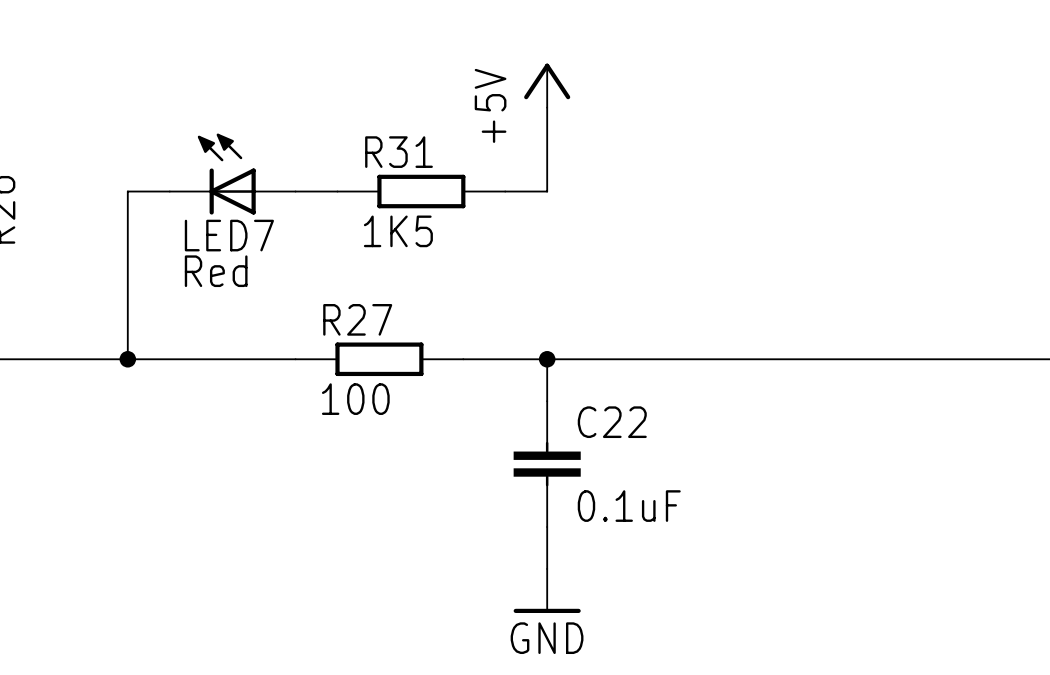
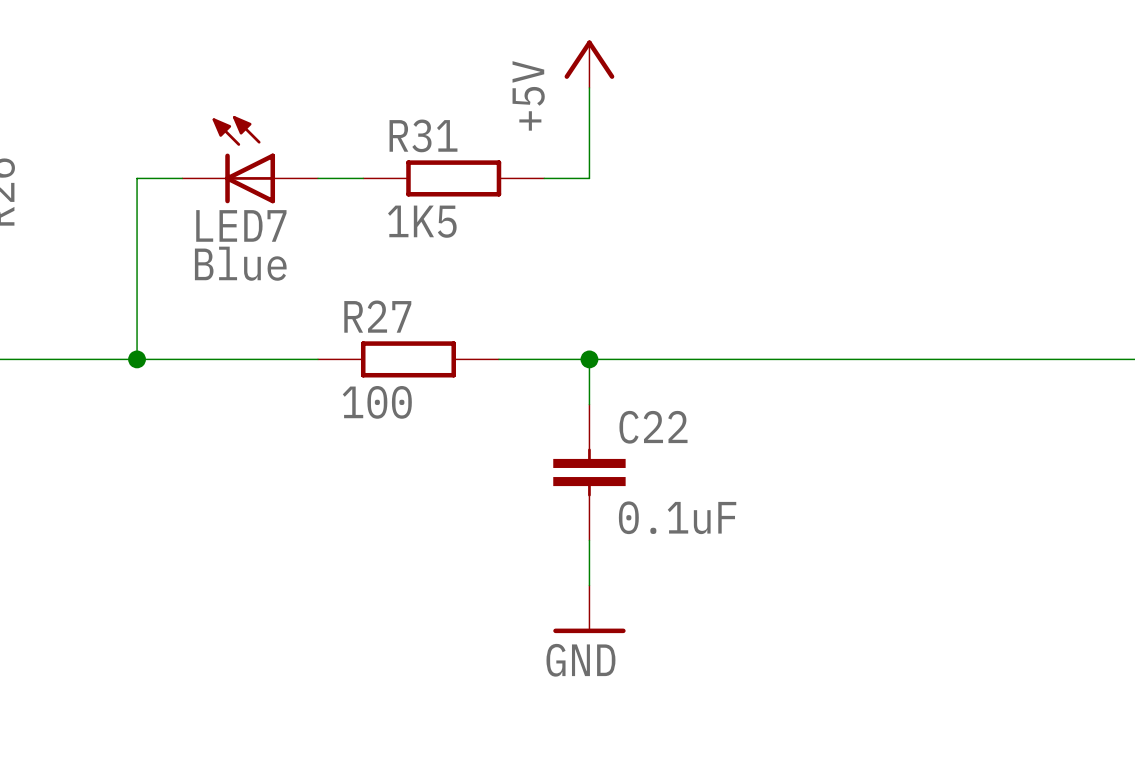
LED7 value: Red (216, 271) -> Blue (240, 263)

